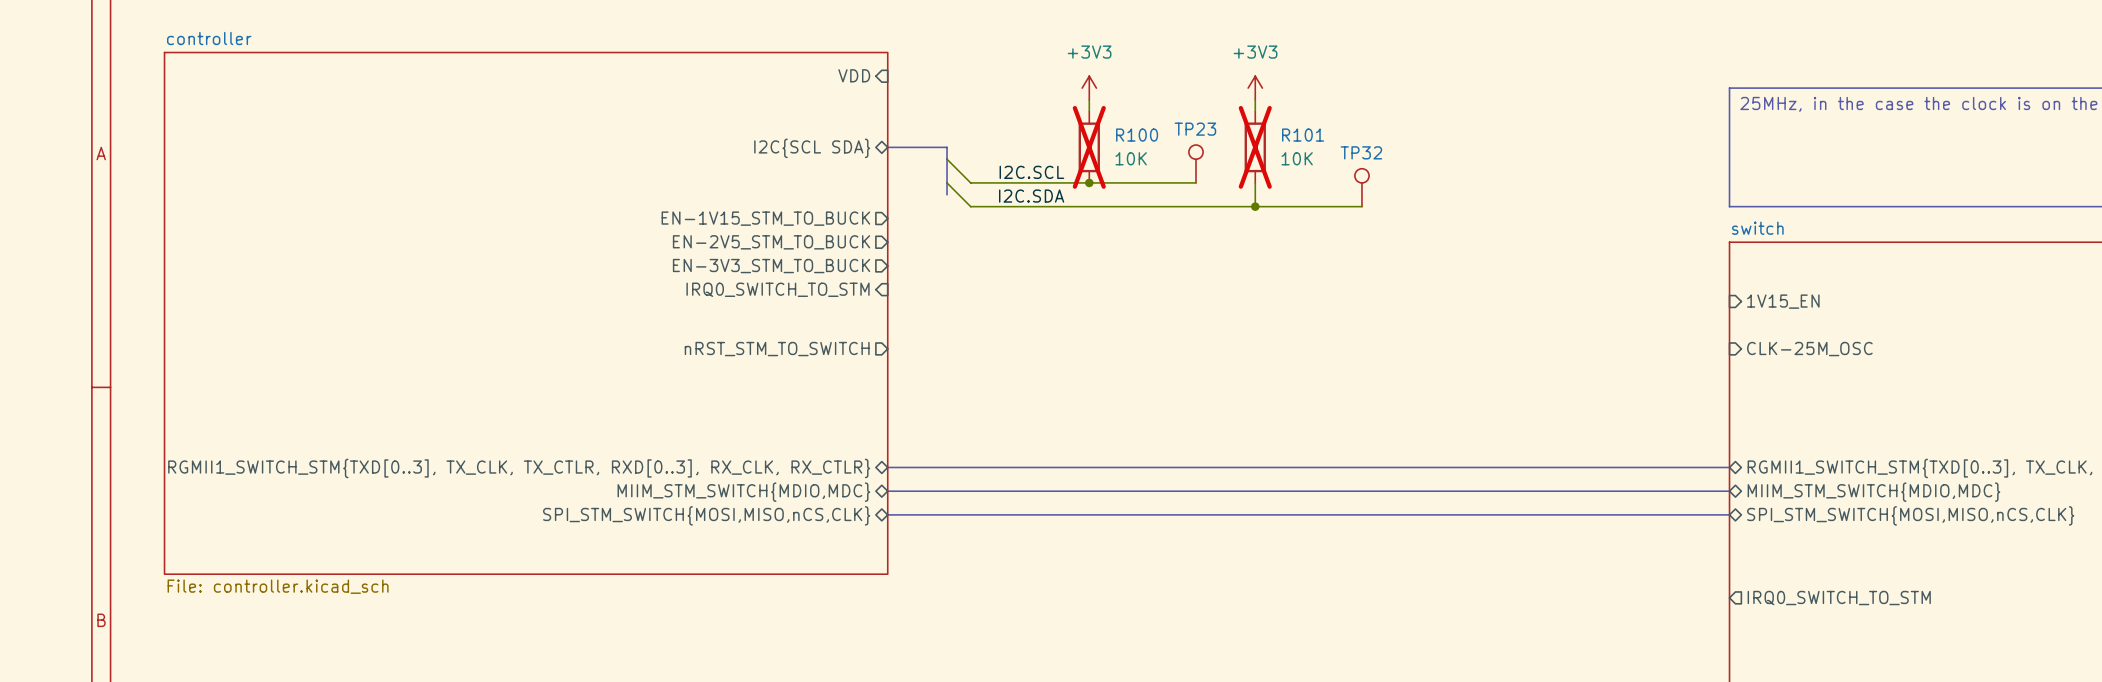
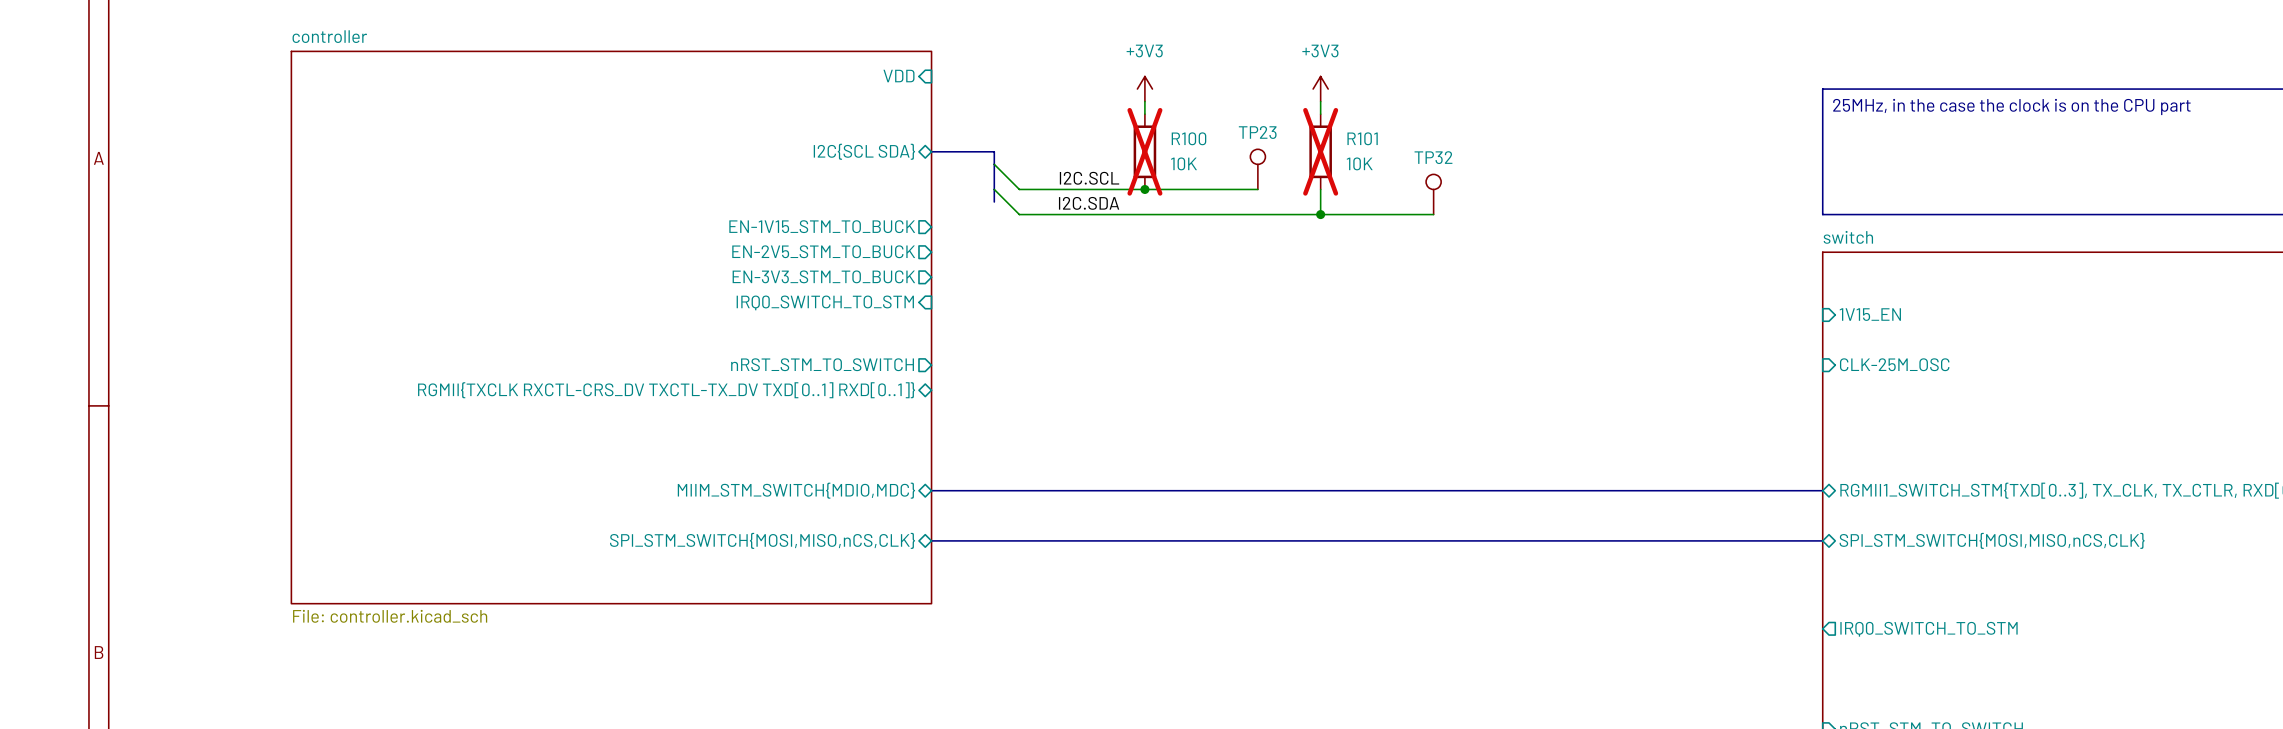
sheet controller: File: controller.kicad_sch (526, 313) -> none
sheet controller: none -> File: controller.kicad_sch (611, 327)
sheet pin: none -> RGMII{TXCLK RXCTL-CRS_DV TXCTL-TX_DV TXD[0..1] RXD[0..1]} (666, 390)
sheet pin: RGMII1_SWITCH_STM{TXD[0..3], TX_CLK, TX_CTLR, RXD[0..3], RX_CLK, RX_CTLR} (519, 468) -> MIIM_STM_SWITCH{MDIO,MDC} (796, 490)
bus: (887, 491) (1729, 491) -> none
sheet pin: MIIM_STM_SWITCH{MDIO,MDC} (743, 492) -> none
sheet pin: MIIM_STM_SWITCH{MDIO,MDC} (1873, 492) -> none

